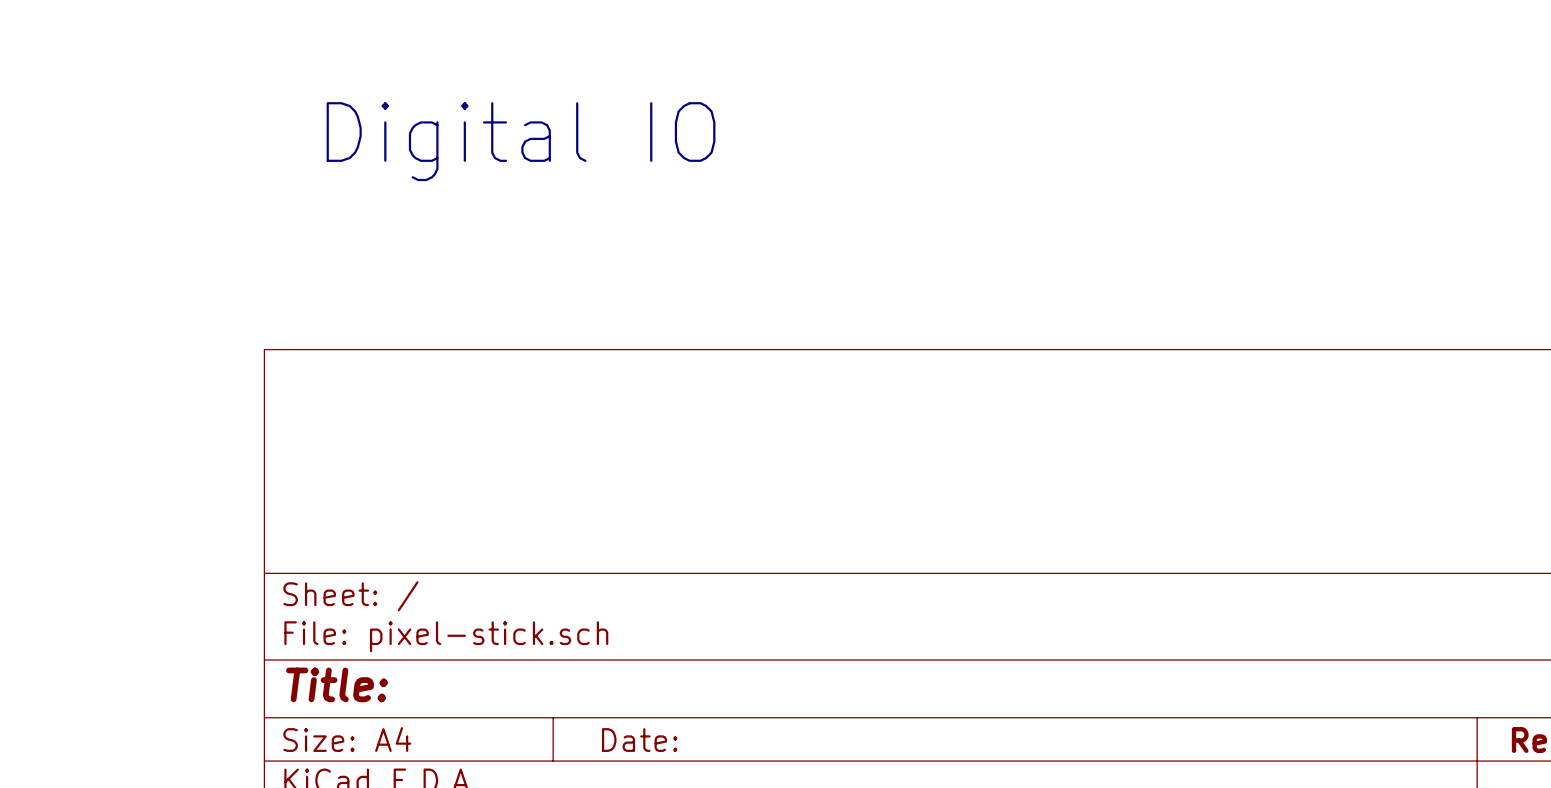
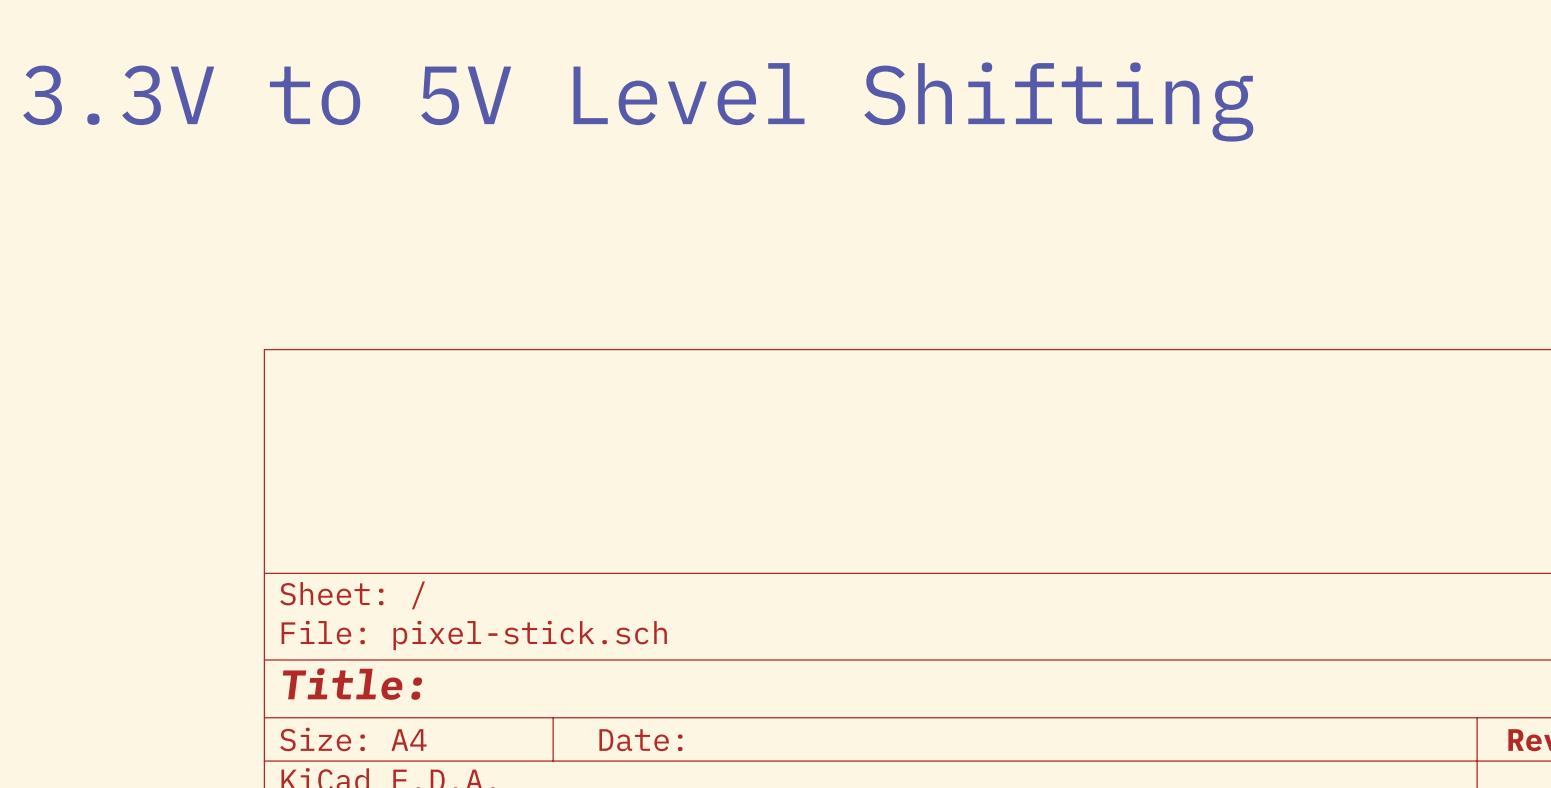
text: none -> 3.3V to 5V Level Shifting (638, 102)
text: Digital IO (521, 141) -> none

